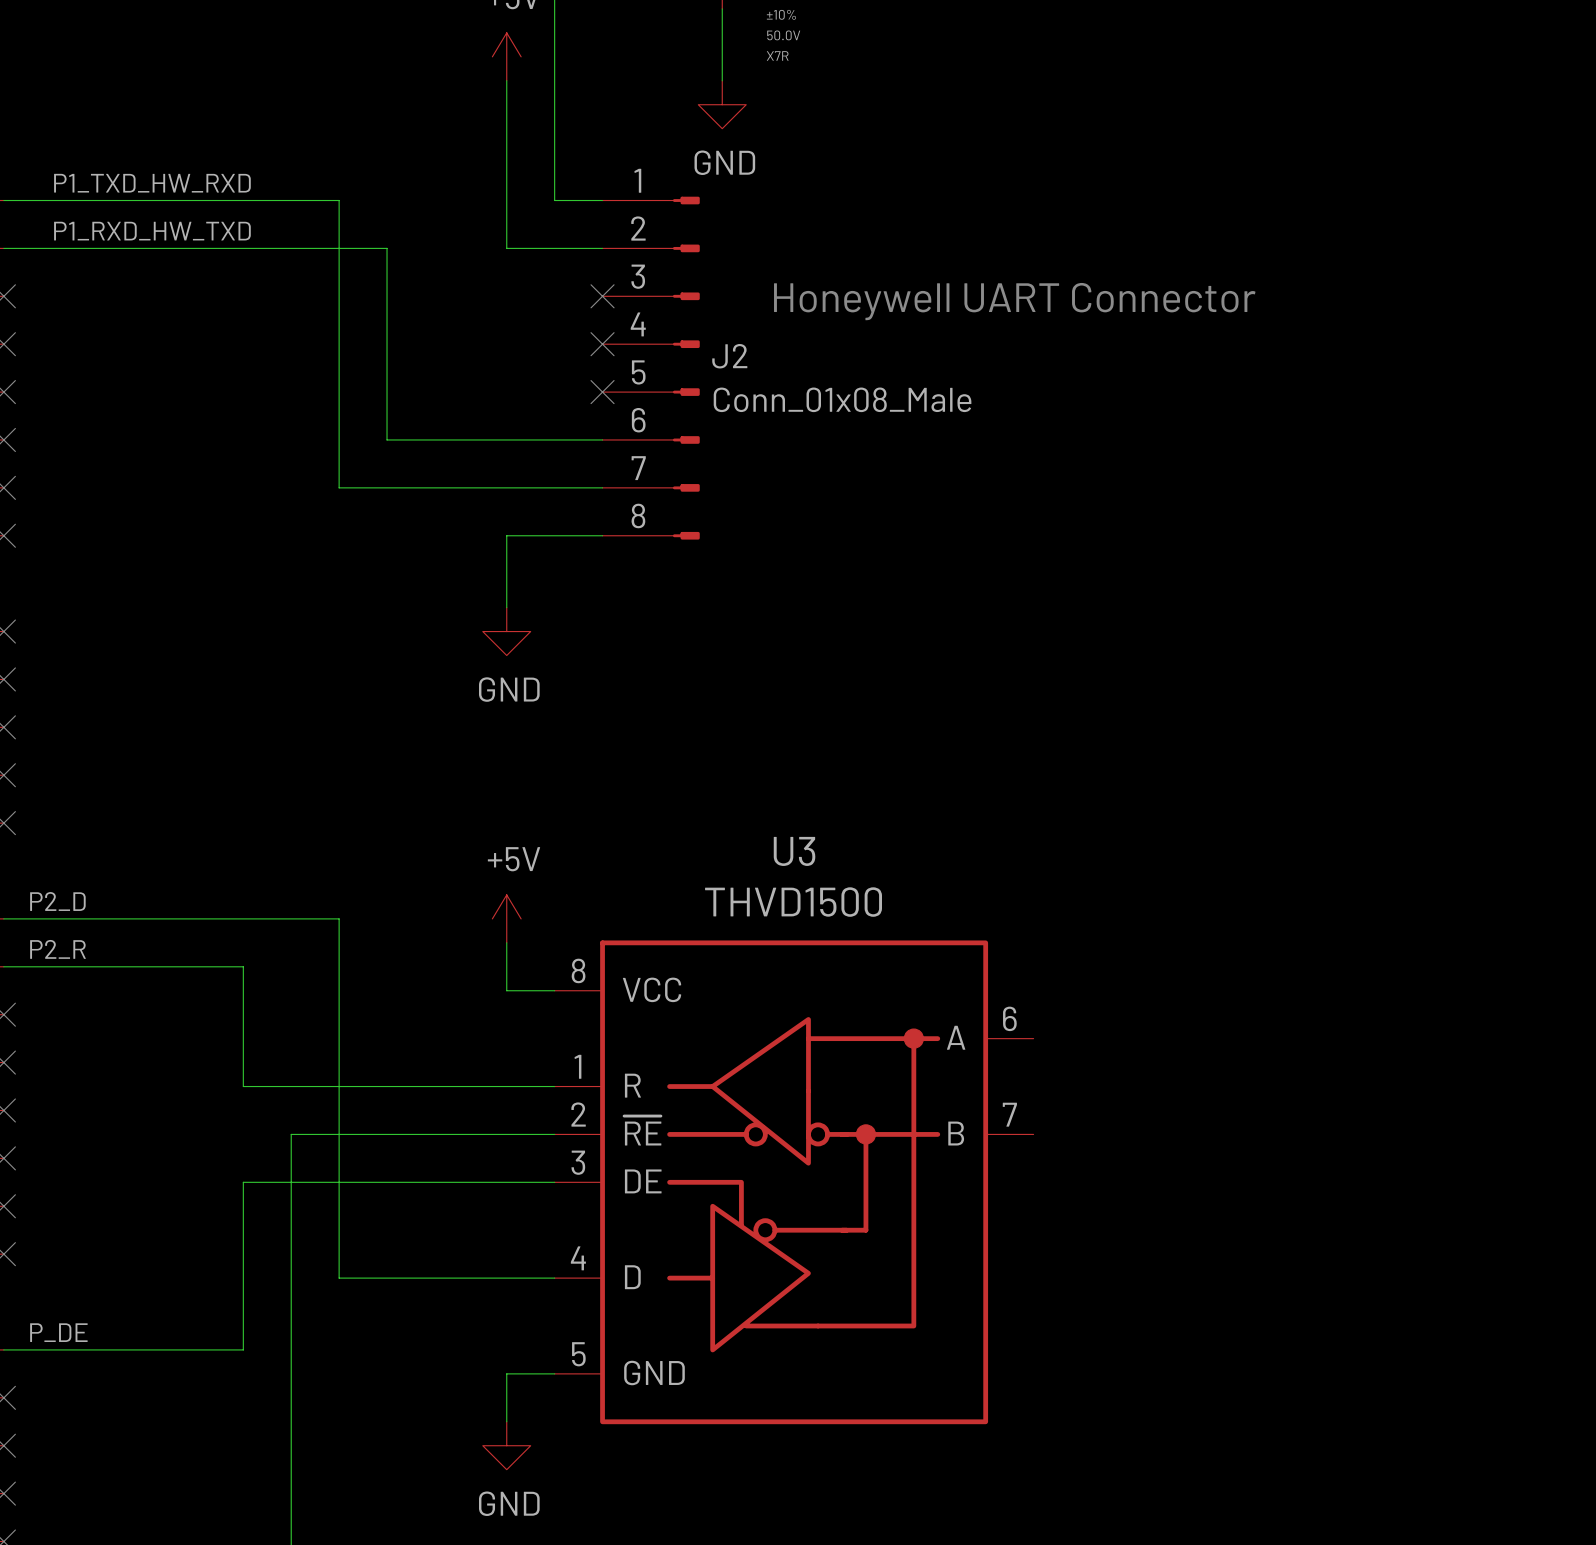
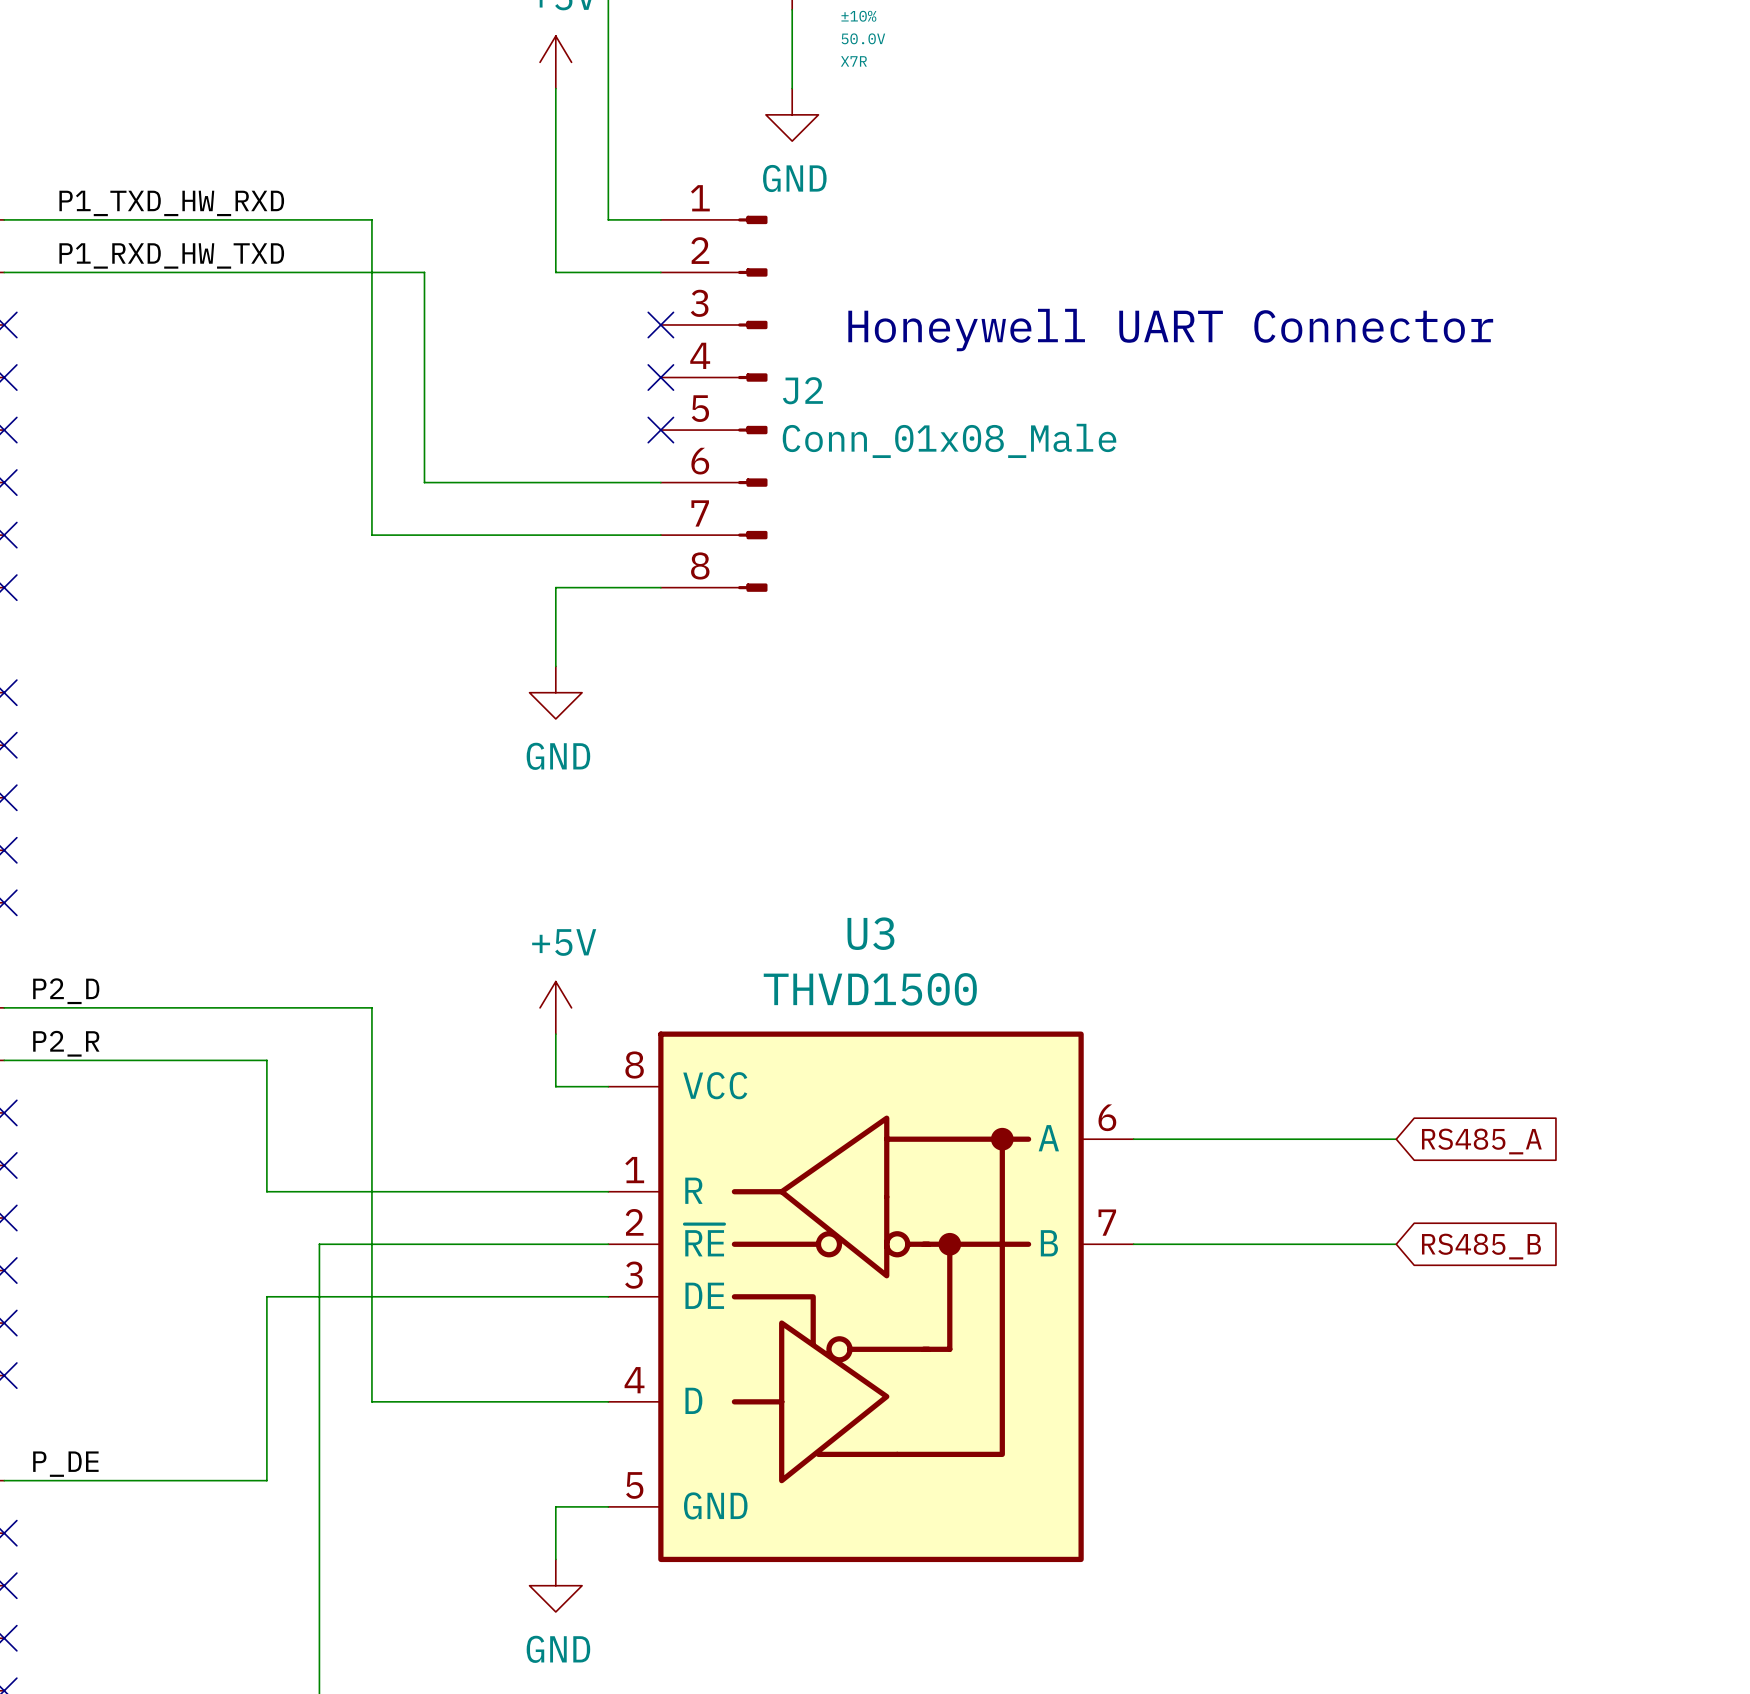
wire: none -> (1133, 1139) (1396, 1139)
global label: none -> RS485_A (1481, 1141)
wire: none -> (1133, 1244) (1396, 1244)
global label: none -> RS485_B (1481, 1246)

